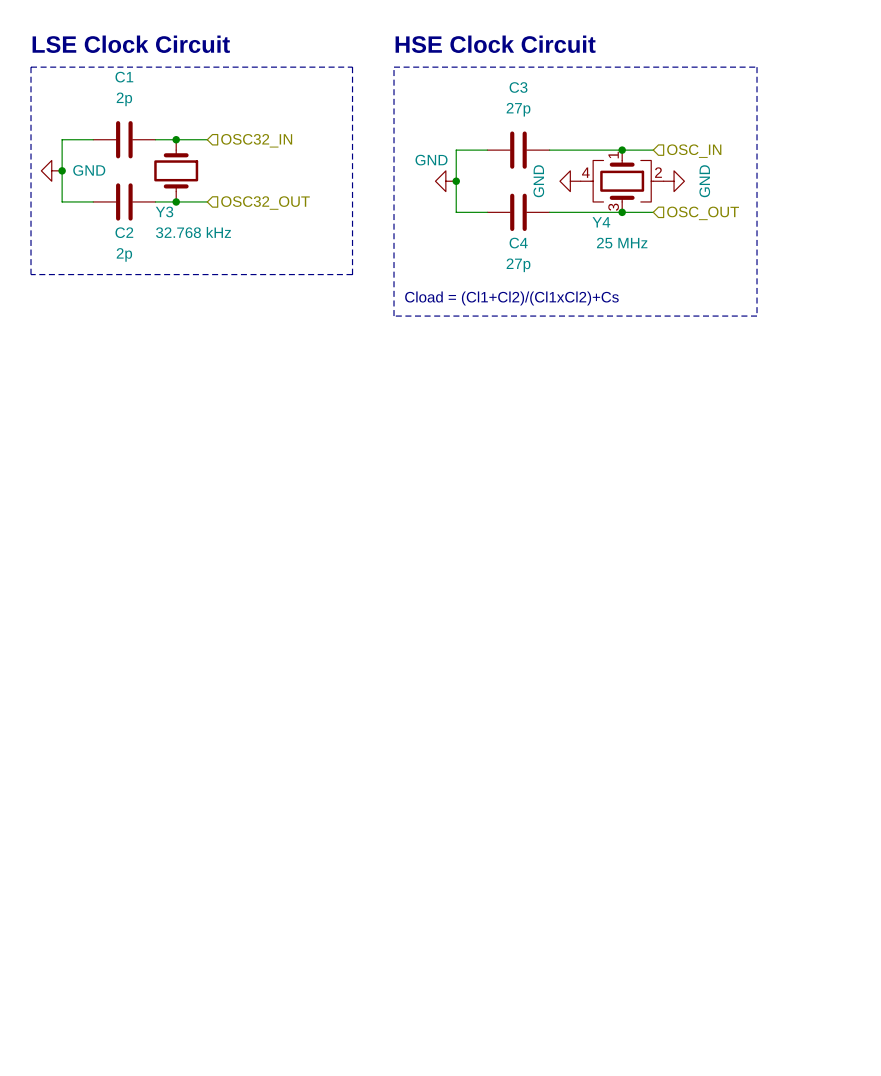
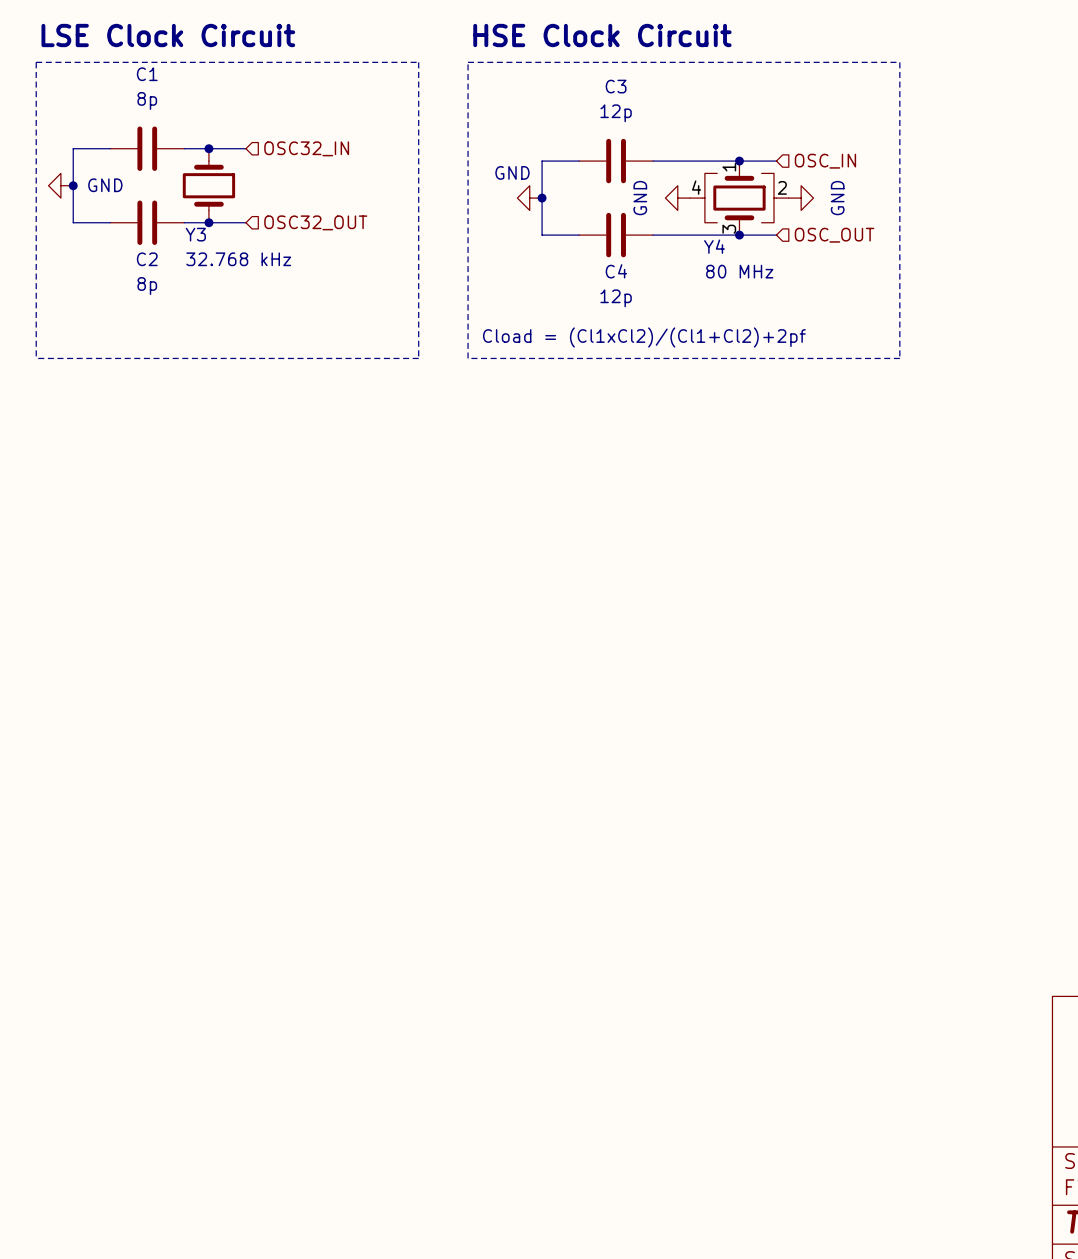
C1 value: 2p (124, 99) -> 8p (147, 100)
C3 value: 27p (518, 109) -> 12p (616, 113)
Y4 value: 25 MHz (622, 243) -> 80 MHz (739, 271)
C2 value: 2p (124, 254) -> 8p (147, 286)
C4 value: 27p (518, 265) -> 12p (616, 298)
line: (31, 274) (352, 274) -> (36, 309) (36, 358) (418, 358) (418, 309)
text: Cload = (Cl1+Cl2)/(Cl1xCl2)+Cs (511, 298) -> Cload = (Cl1xCl2)/(Cl1+Cl2)+2pf (644, 337)

